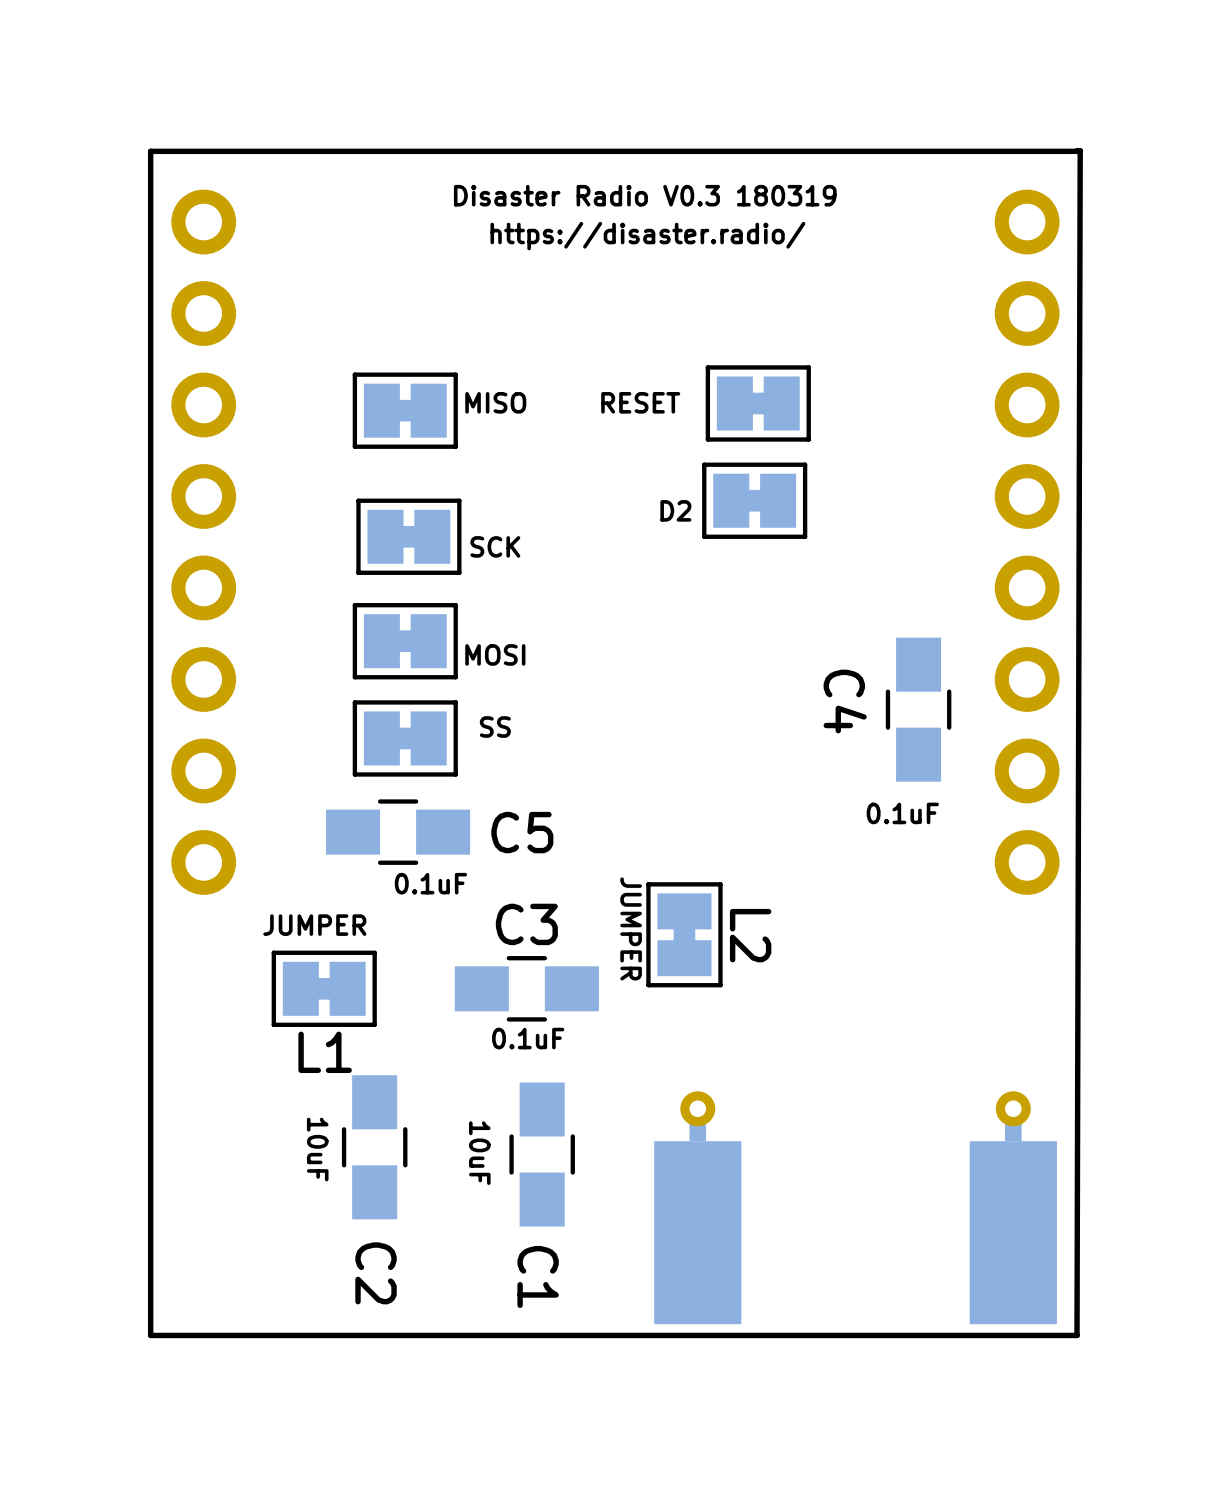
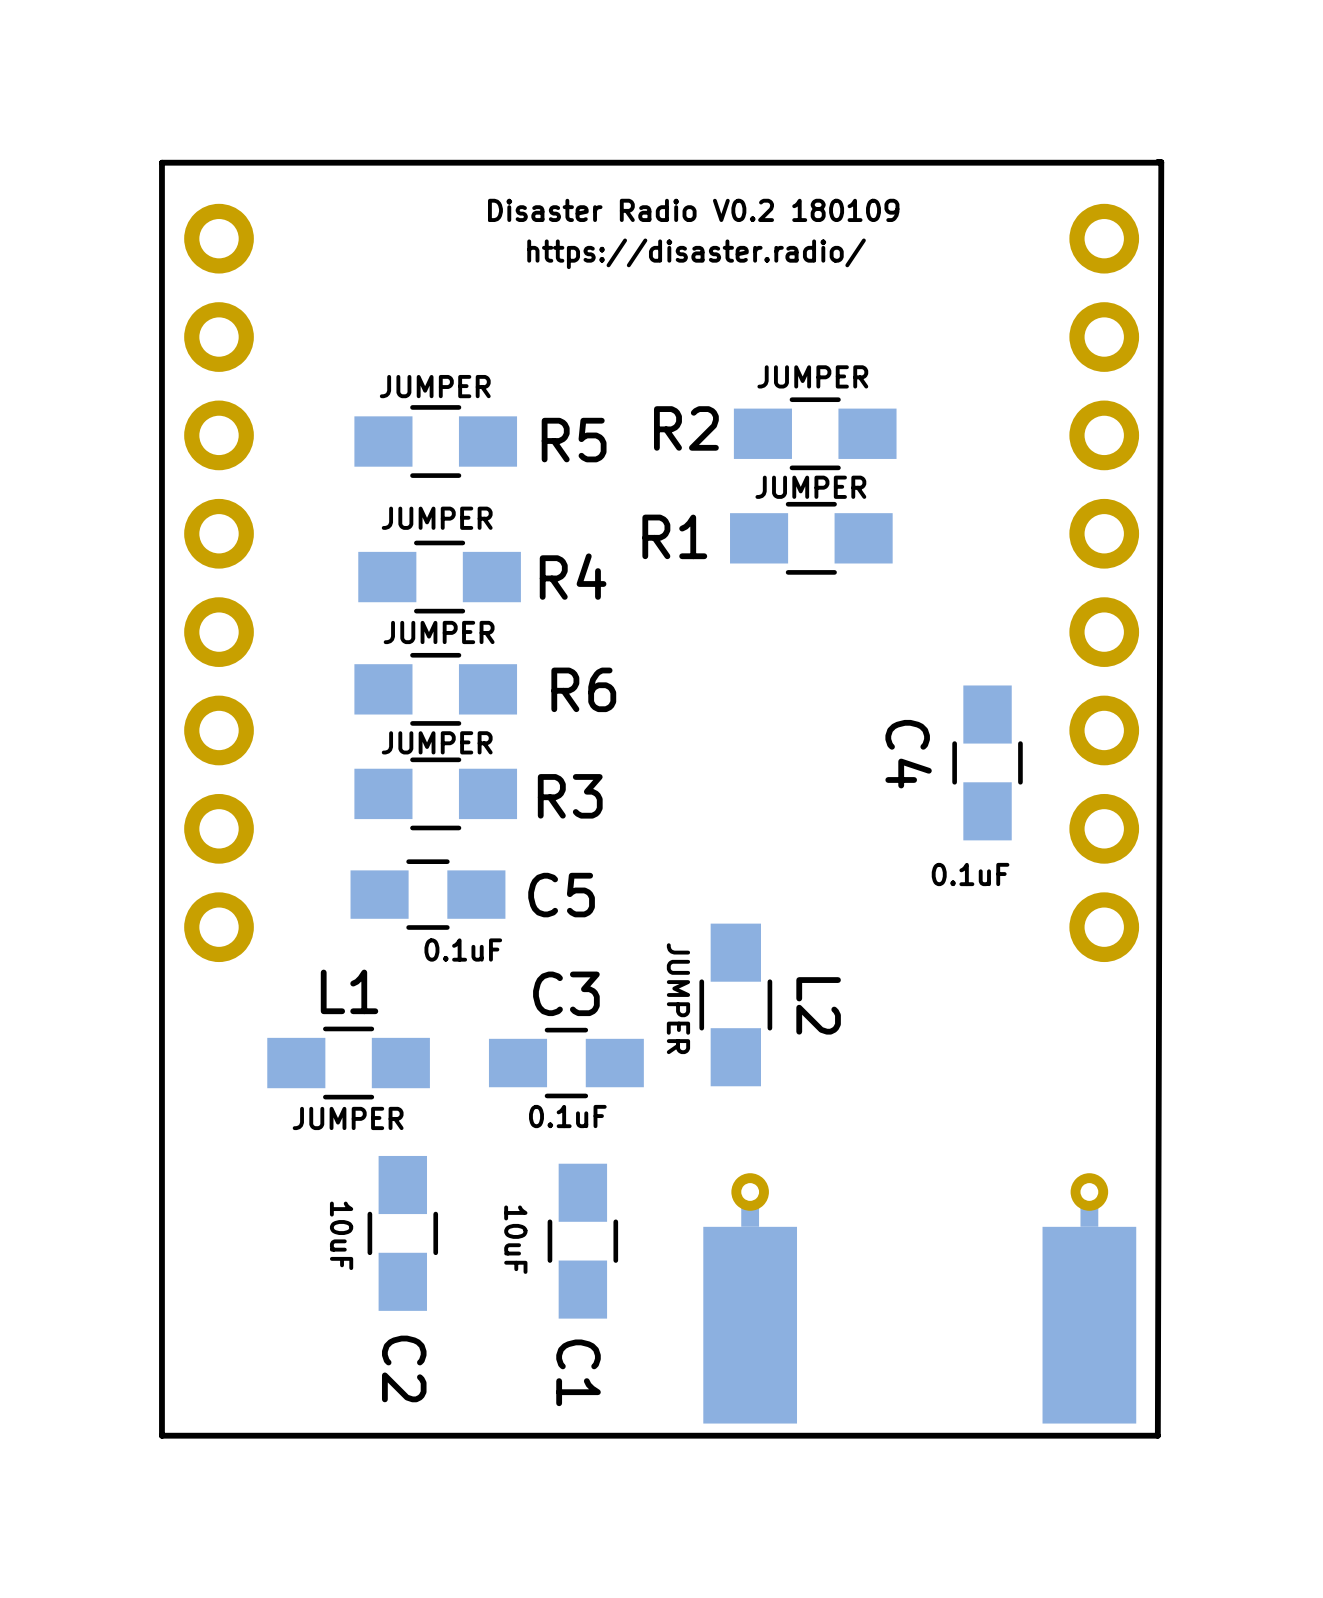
text: Disaster Radio V0.3 180319 (645, 195) -> Disaster Radio V0.2 180109 (693, 210)
text: none -> JUMPER (812, 376)
text: none -> JUMPER (435, 386)
text: MISO (495, 402) -> none
text: RESET (640, 402) -> none
part: (758, 403) -> none
R2: none -> (815, 433)
part: (405, 410) -> none
R5: none -> (435, 441)
text: none -> JUMPER (810, 487)
text: none -> JUMPER (437, 518)
part: (754, 500) -> none
R1: none -> (811, 538)
text: D2 (675, 510) -> none
part: (408, 536) -> none
R4: none -> (439, 577)
text: SCK (495, 546) -> none
text: none -> JUMPER (439, 632)
part: (405, 641) -> none
R6: none -> (435, 689)
text: MOSI (495, 654) -> none
text: none -> JUMPER (437, 742)
text: SS (495, 726) -> none
part: (405, 738) -> none
R3: none -> (435, 793)
L2 footprint: [646, 882, 723, 988] -> [699, 923, 773, 1087]
text position: JUMPER (314, 925) -> JUMPER (348, 1118)
L1 footprint: [271, 950, 377, 1027] -> [267, 1026, 430, 1100]
L1 name position: L1 (325, 1052) -> L1 (349, 991)

